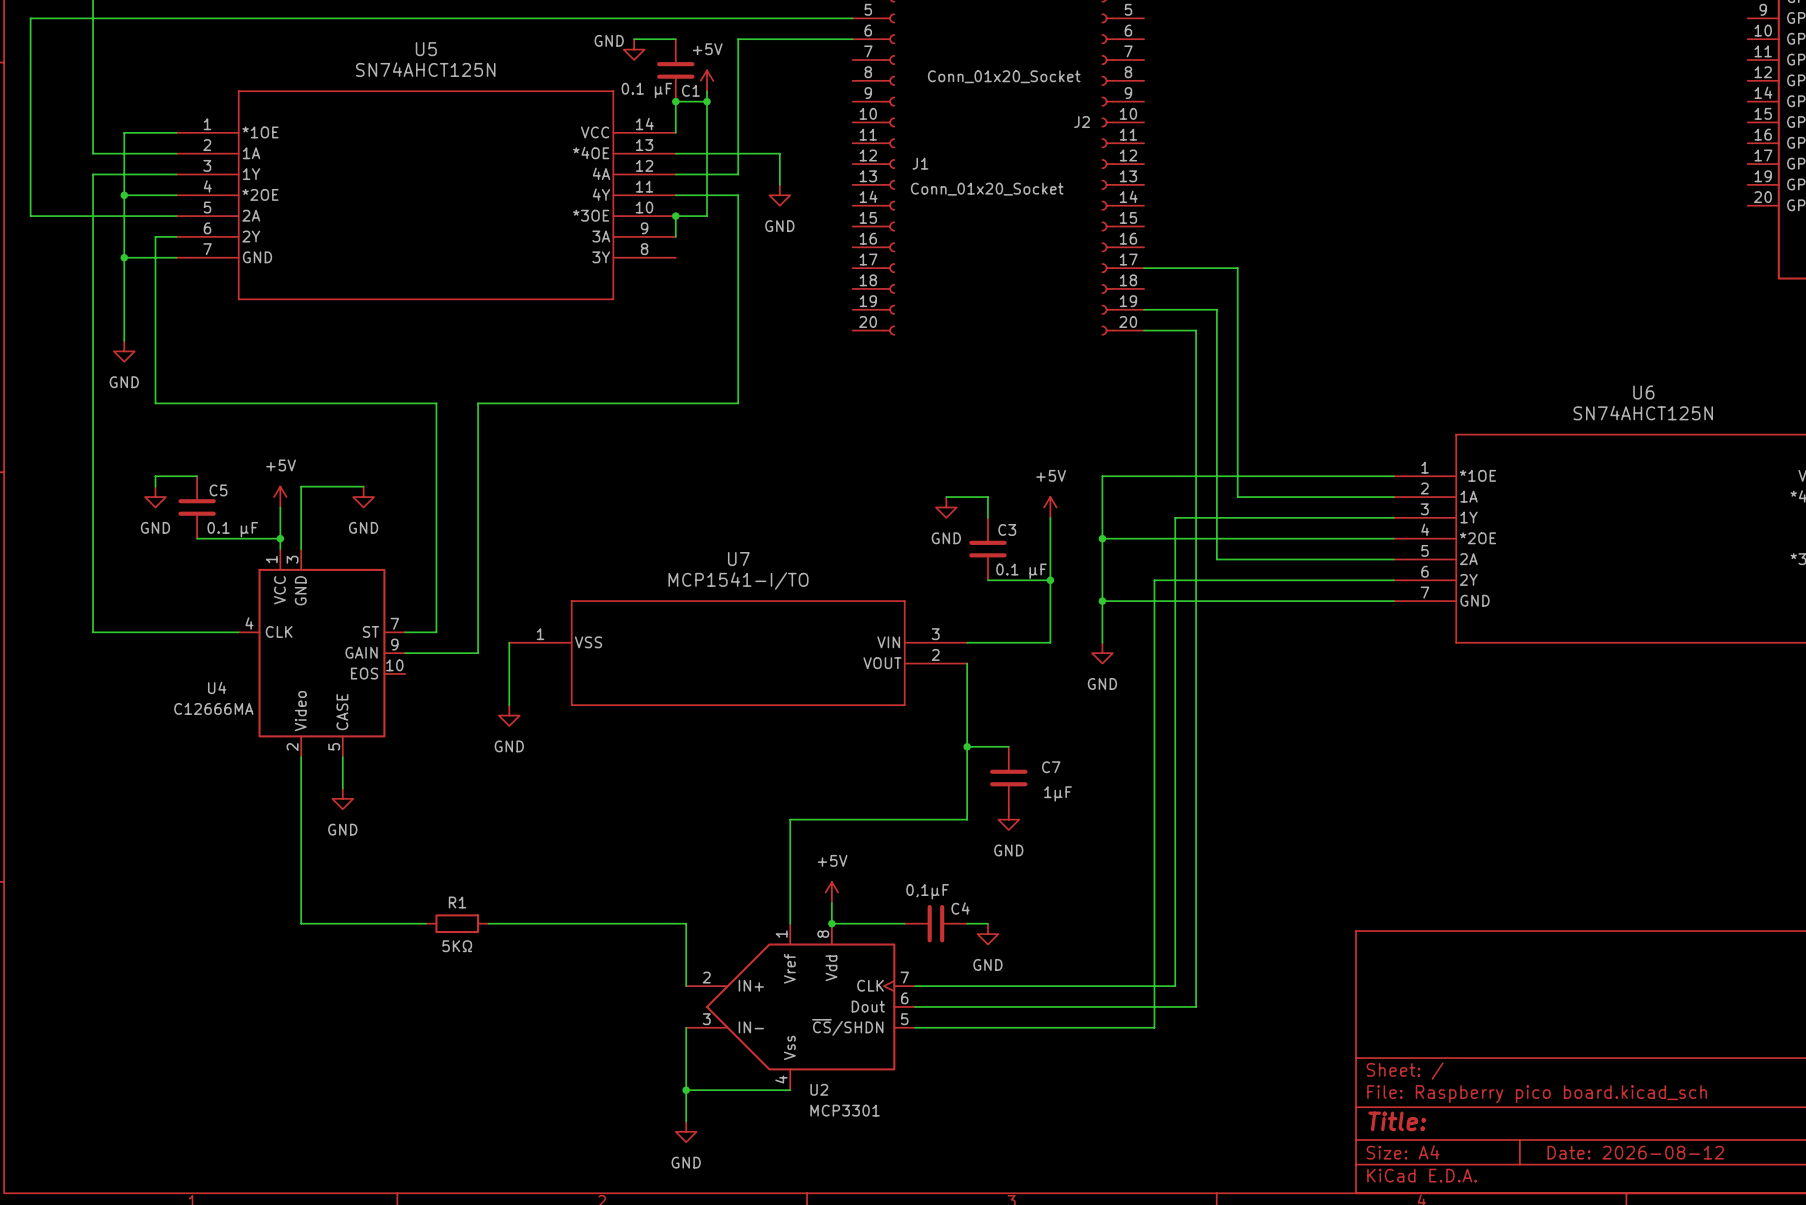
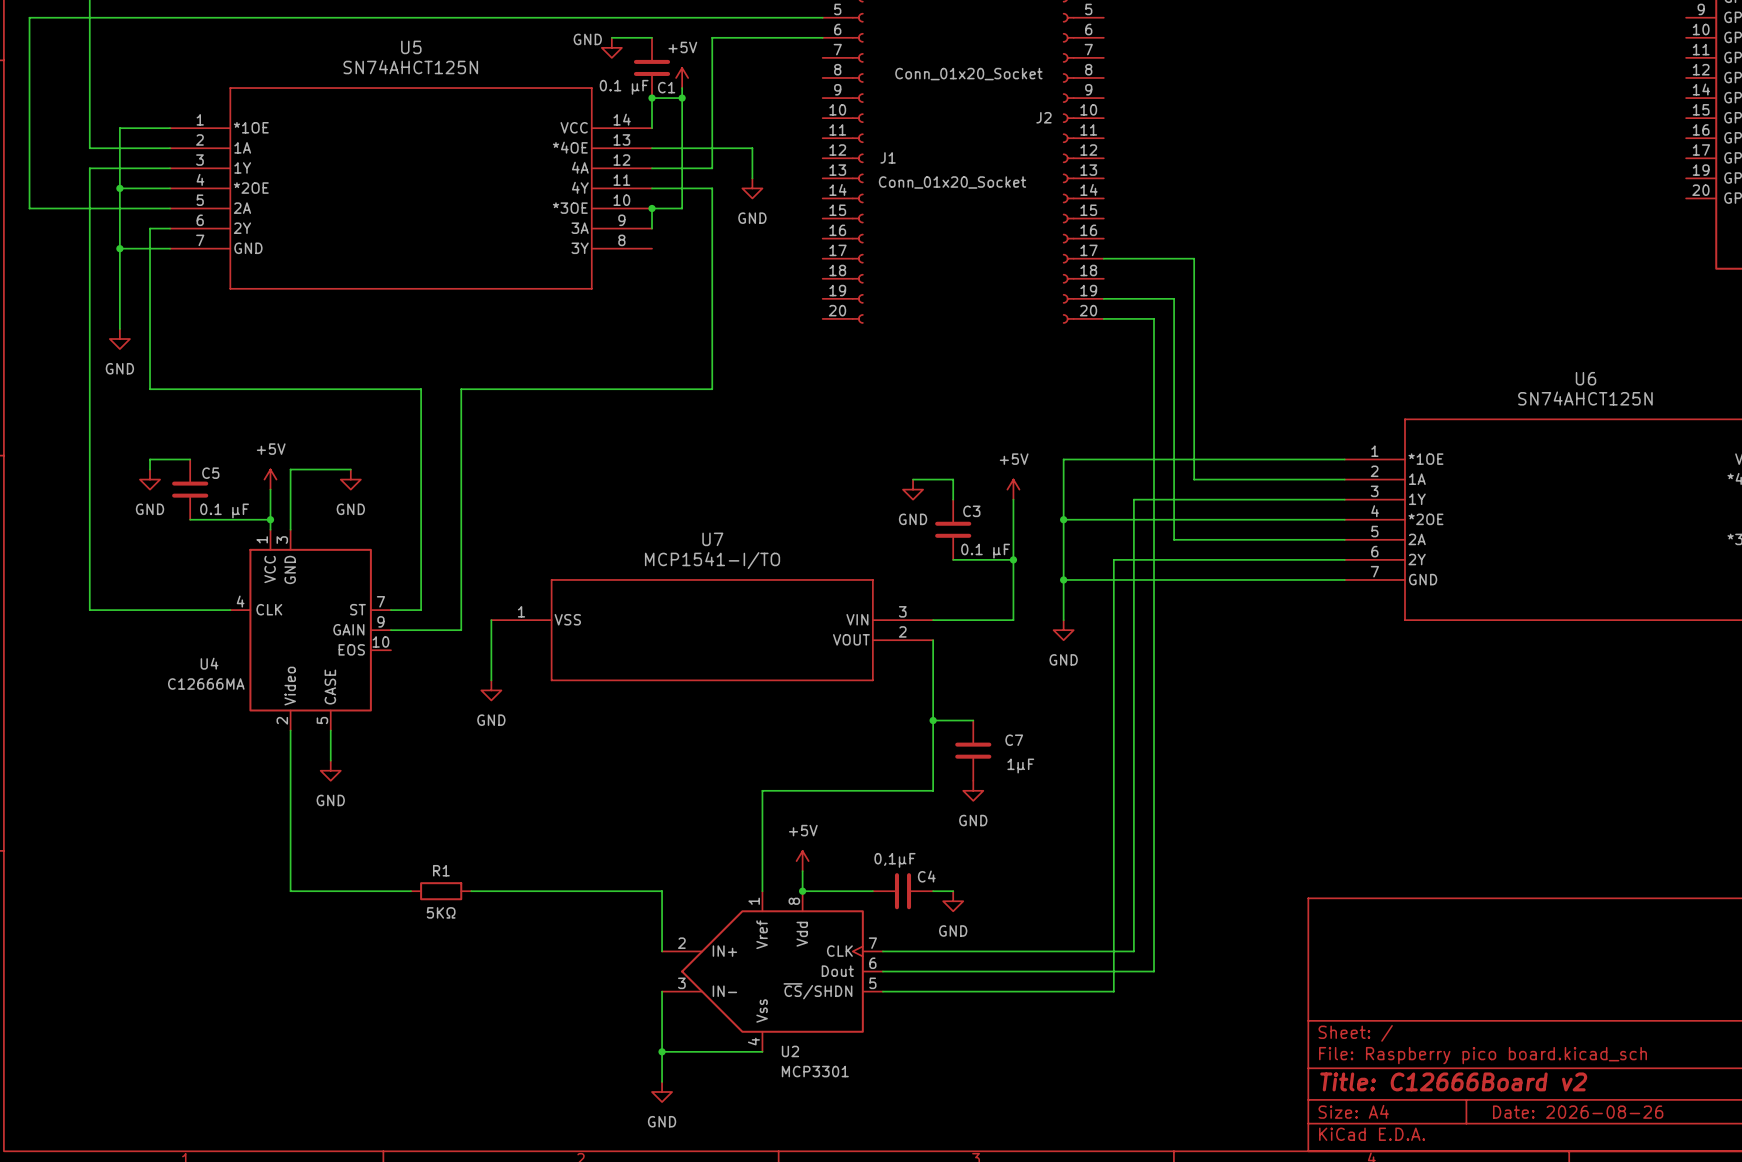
title block: Title: (1397, 1121) -> Title: C12666Board v2 (1453, 1081)
title block: Date: 2026-08-12 (1635, 1152) -> Date: 2026-08-26 (1578, 1112)

